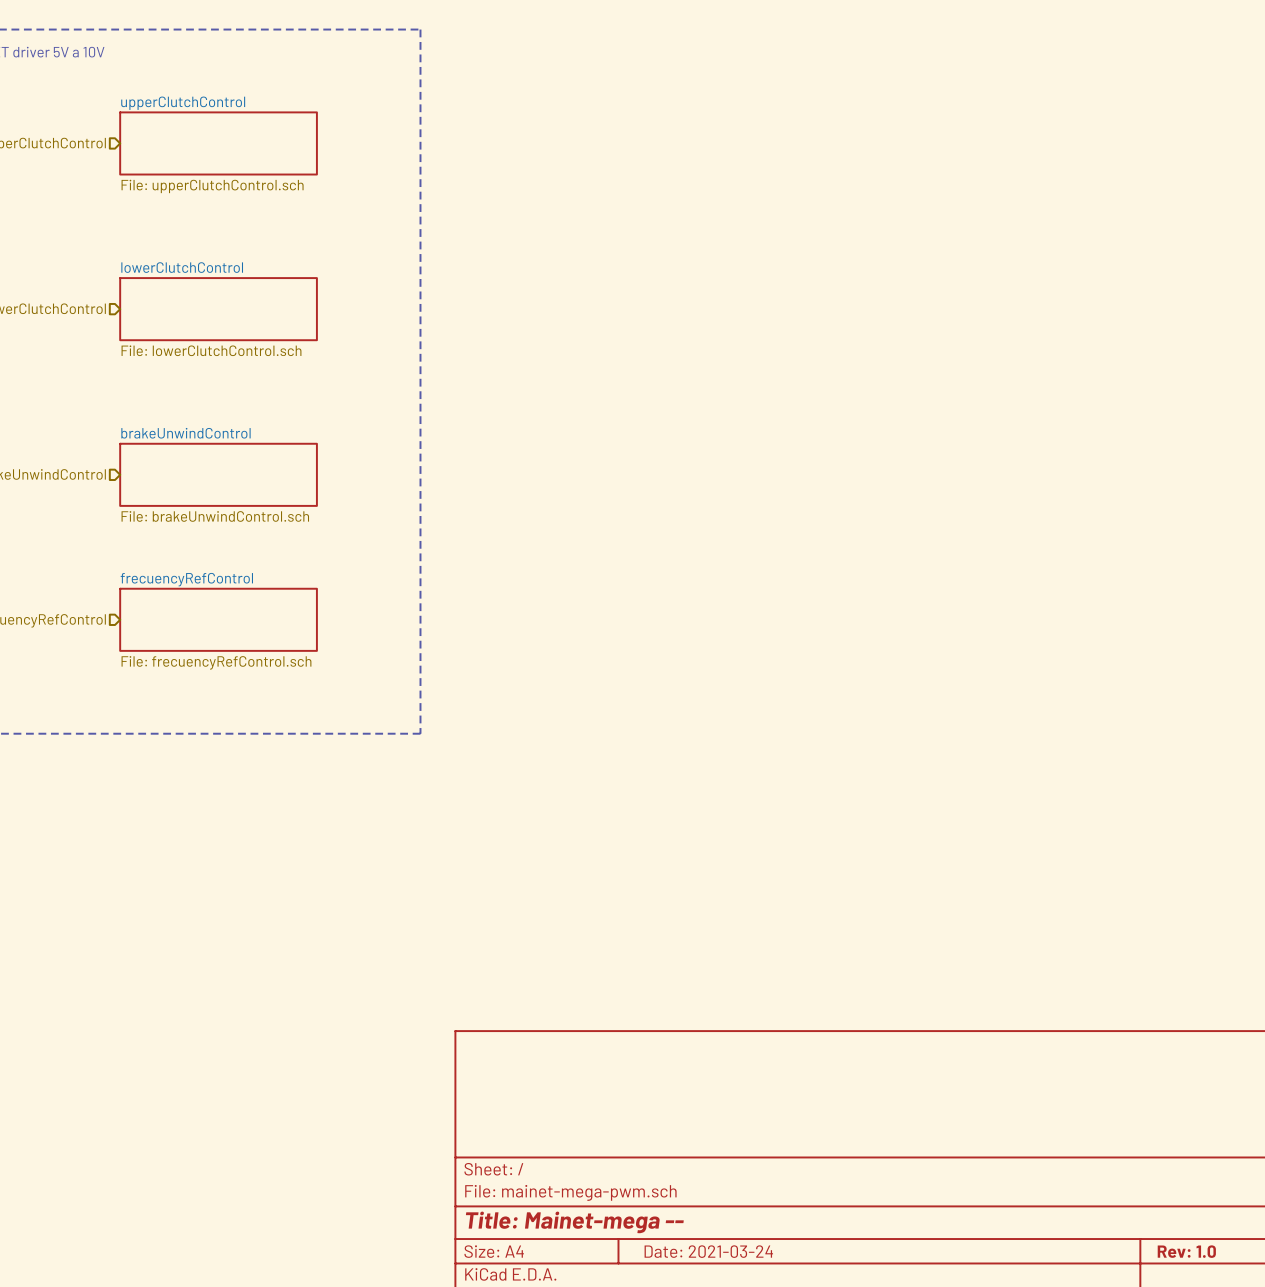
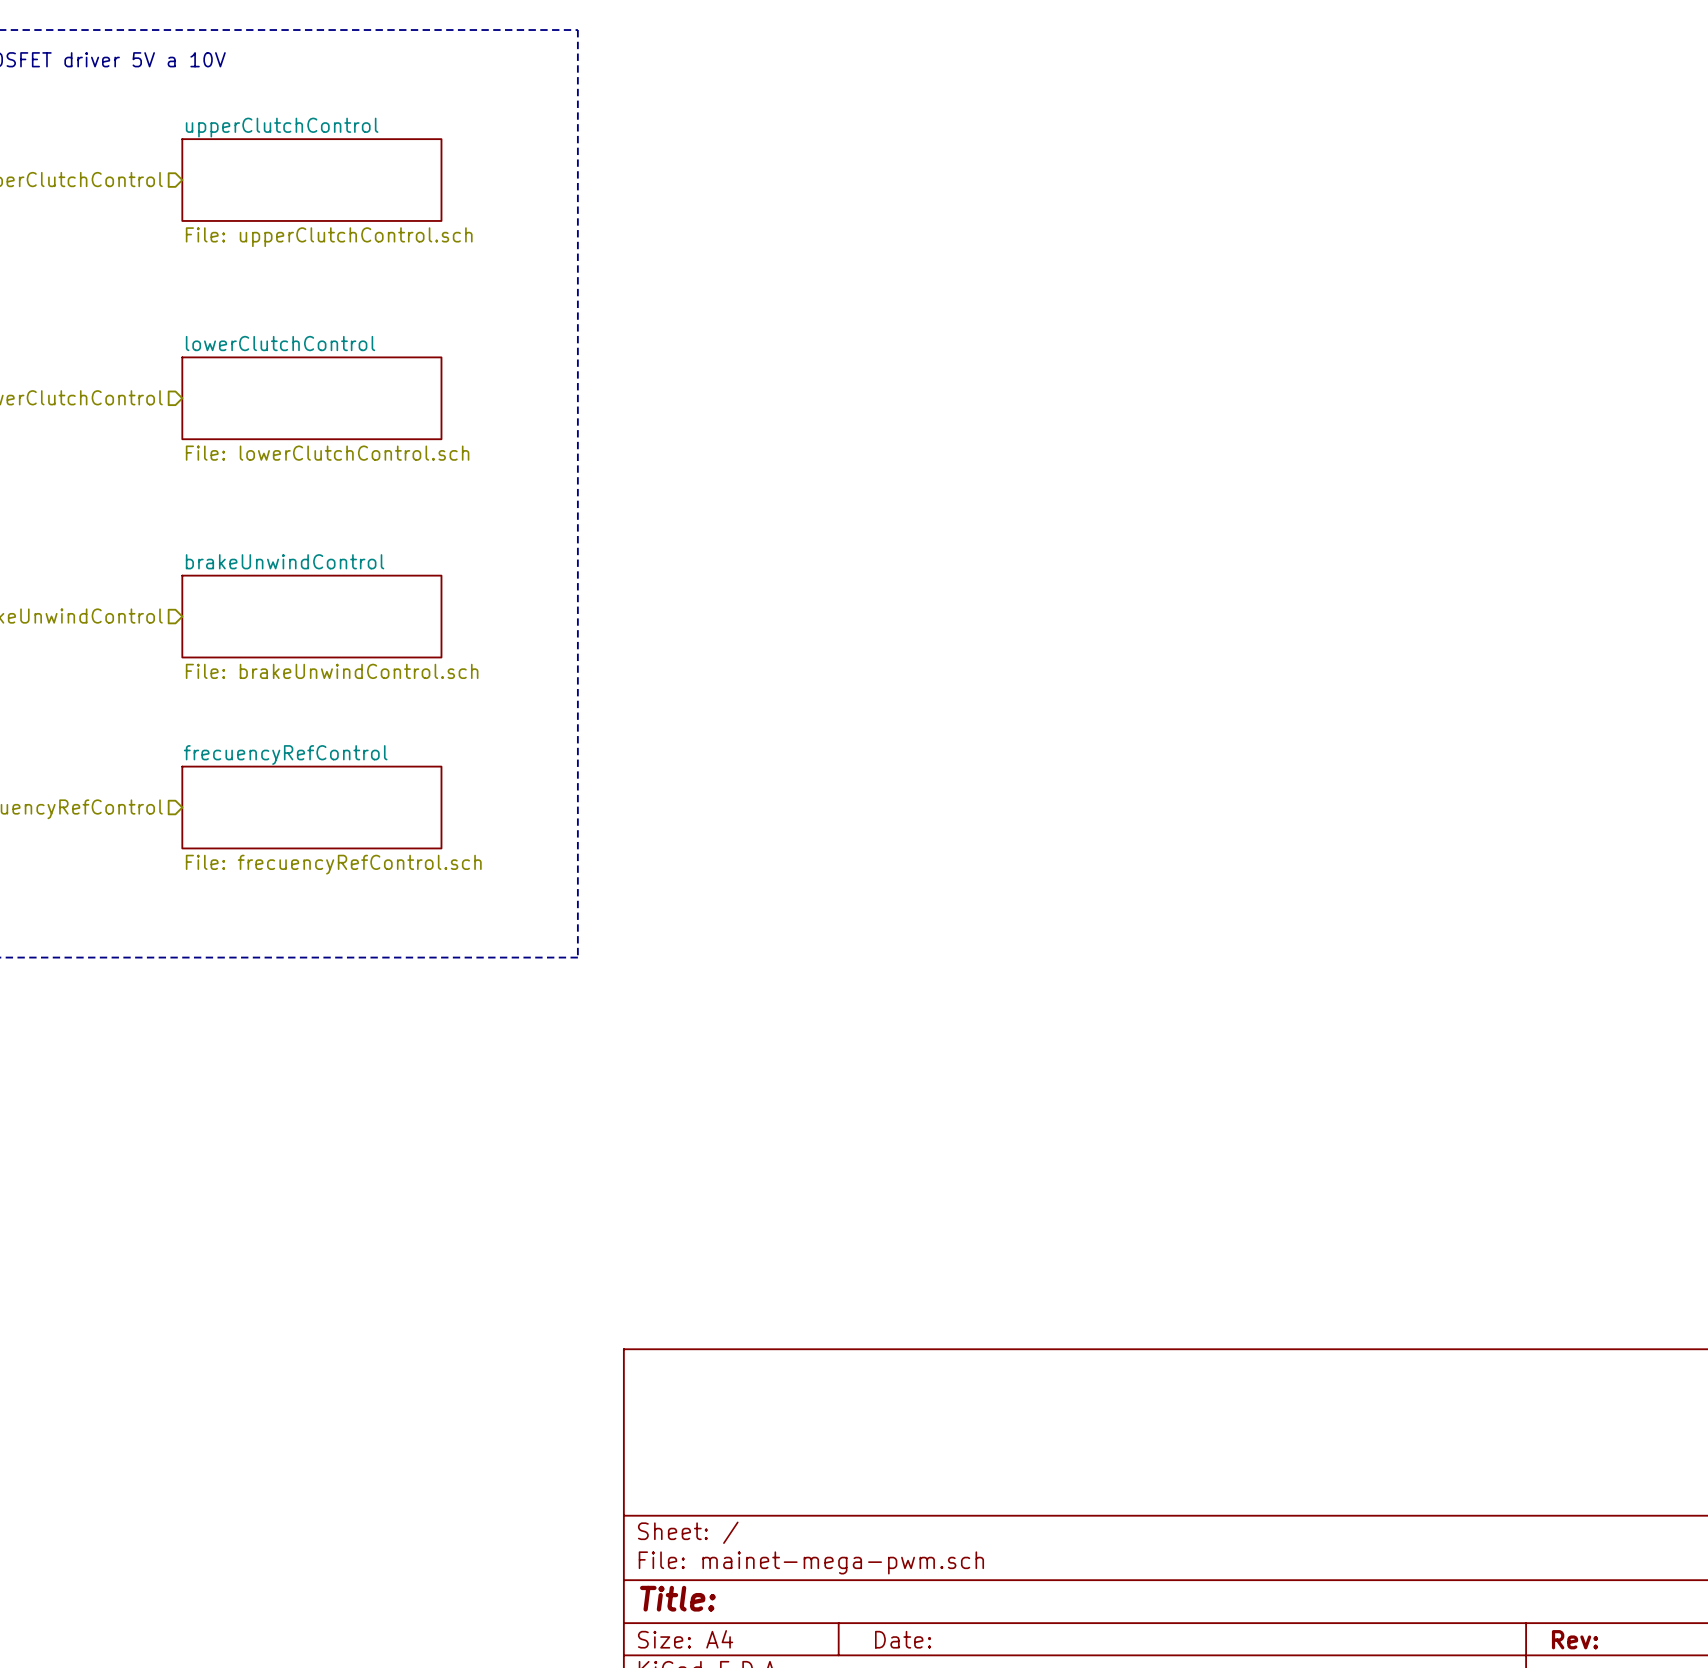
title block: Title: Mainet-mega -- (574, 1222) -> Title: (677, 1598)
title block: Date: 2021-03-24 (708, 1251) -> Date: (903, 1639)
title block: Rev: 1.0 (1186, 1251) -> Rev: (1575, 1639)

